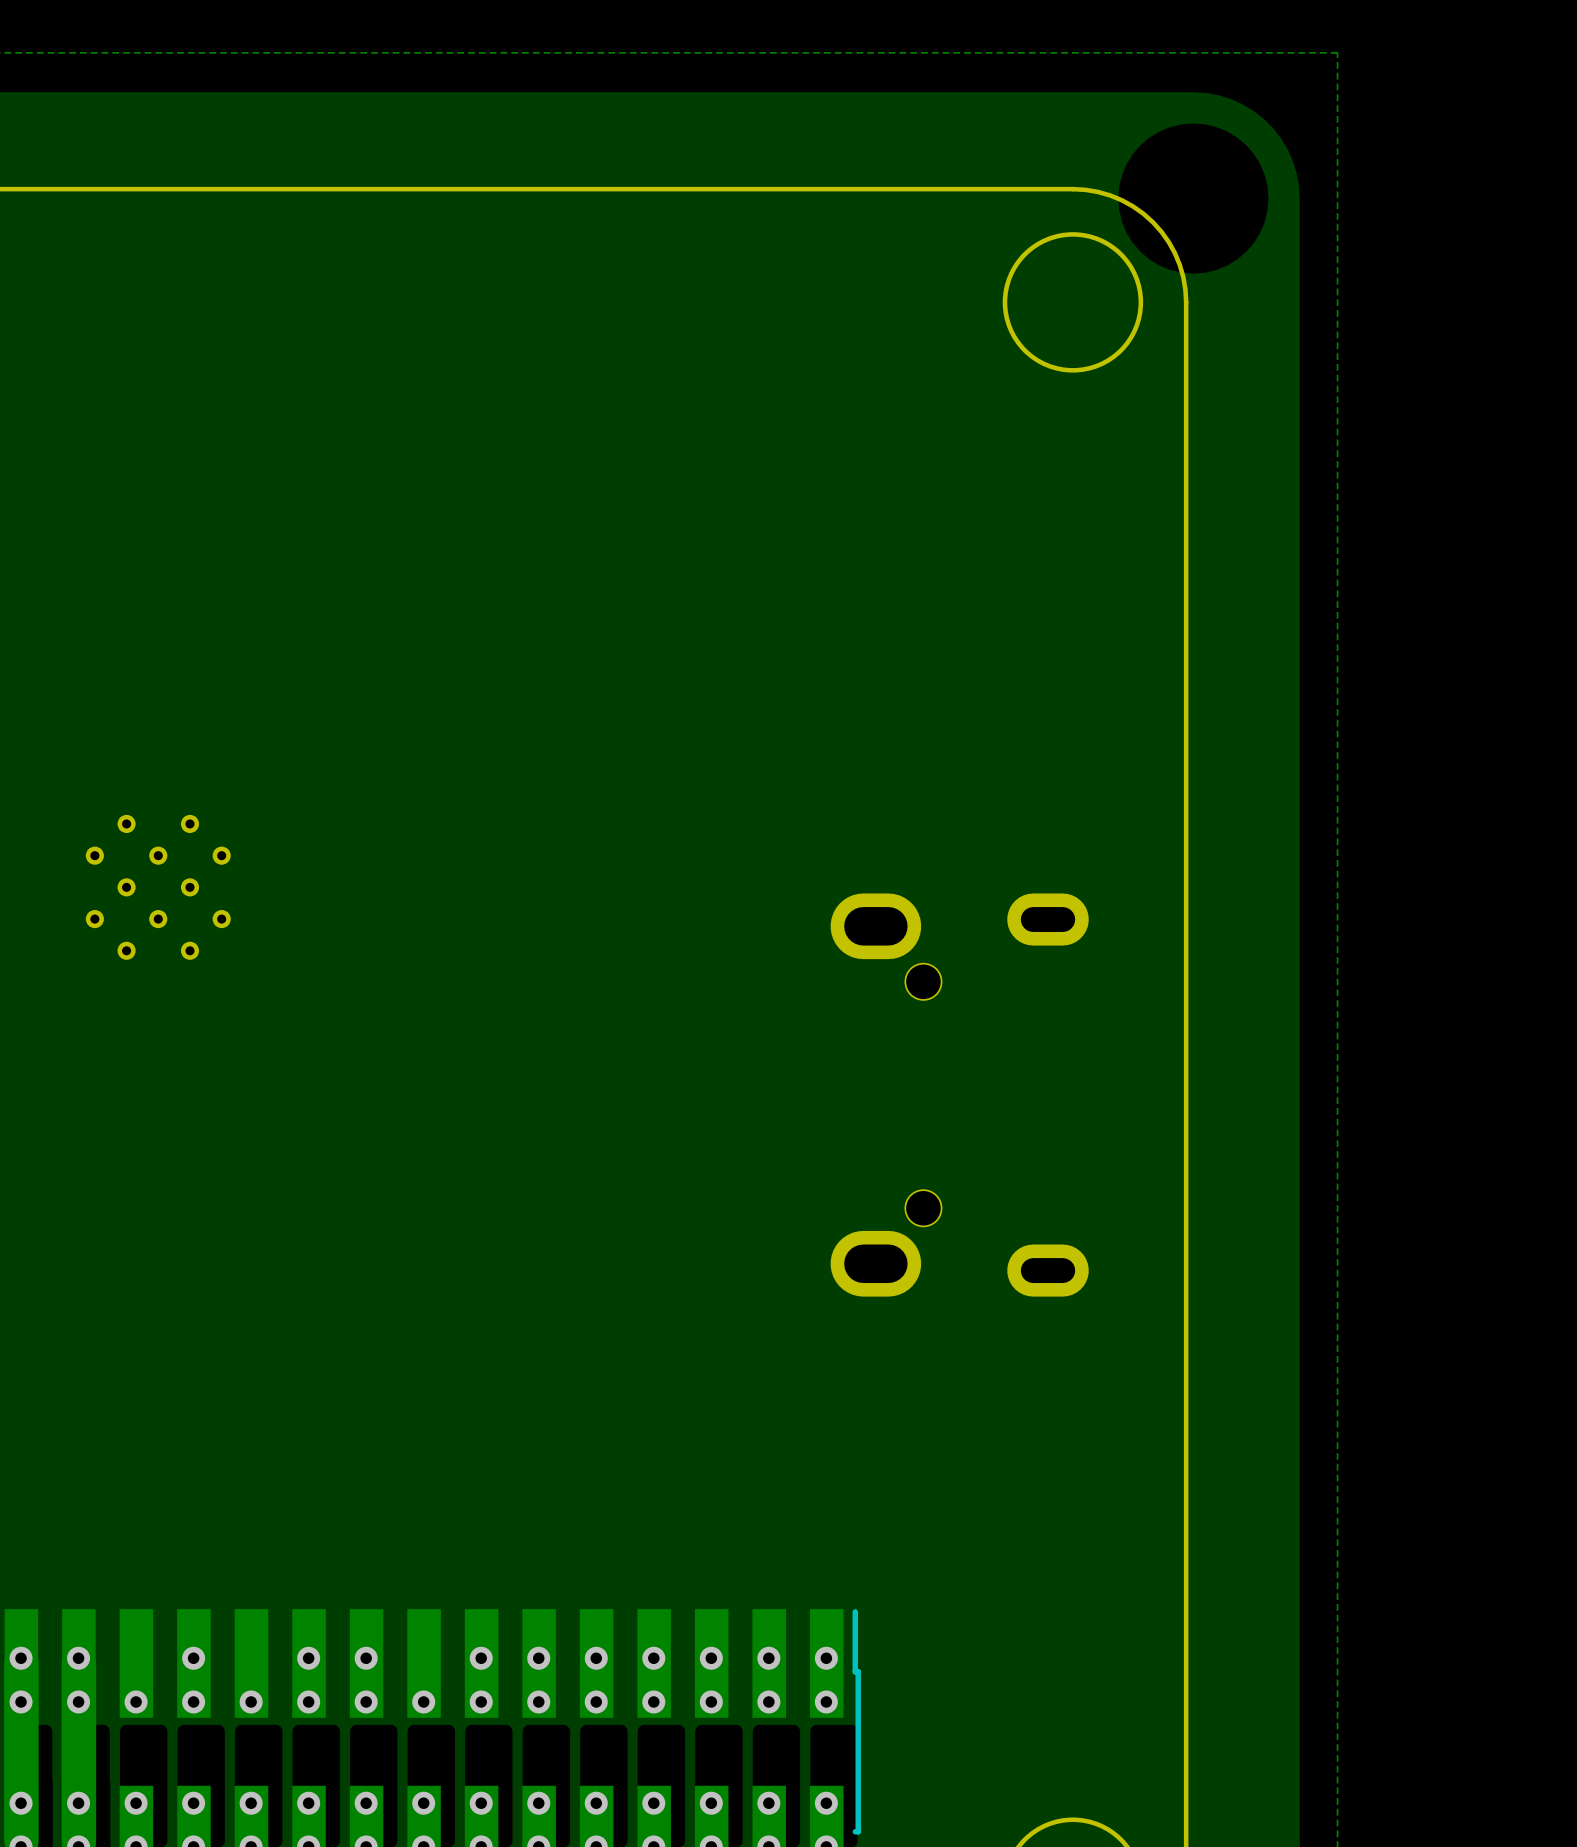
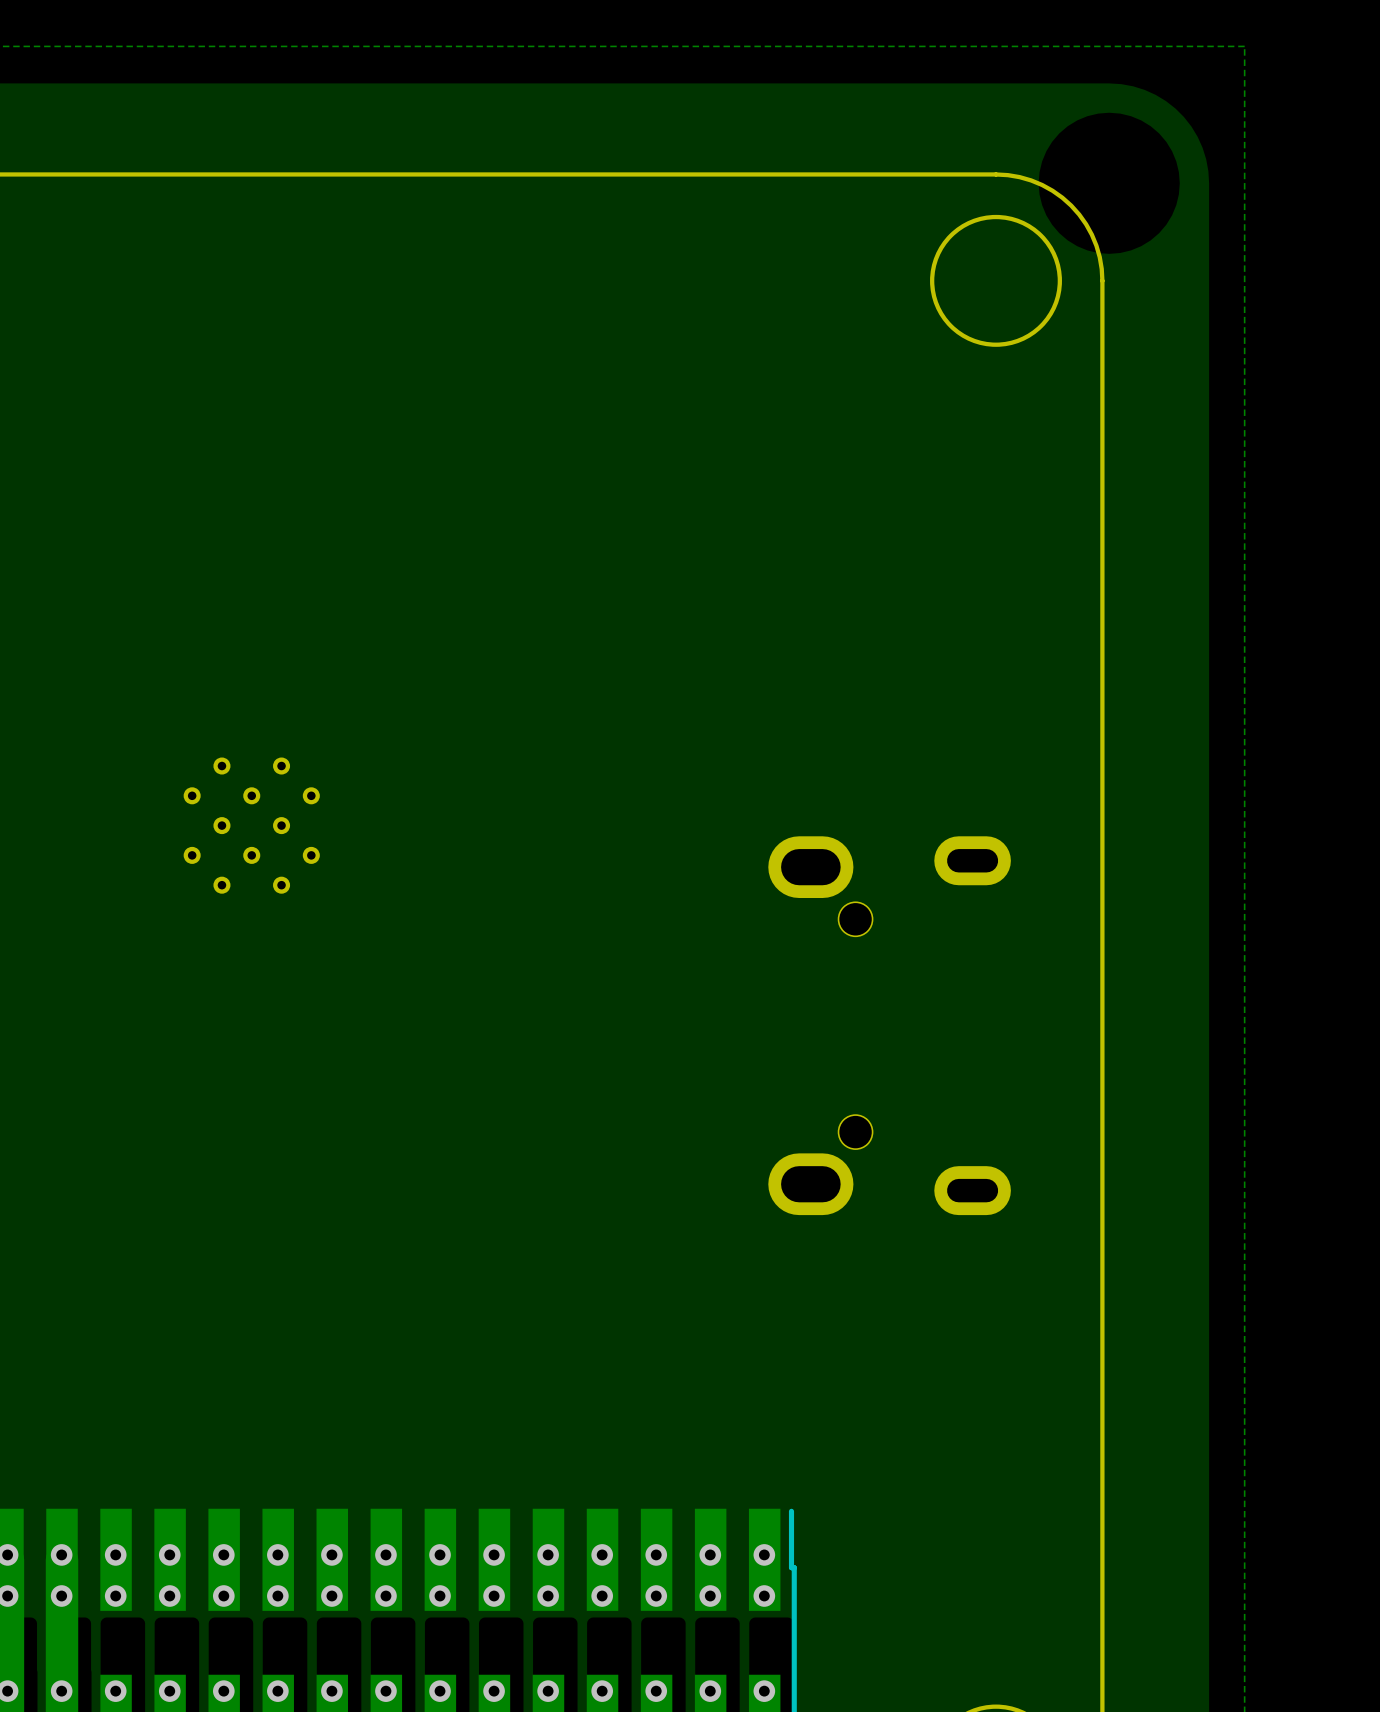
part position: (158, 887) -> (251, 825)
via: none -> (115, 1554)
via: none -> (223, 1554)
via: none -> (385, 1554)

